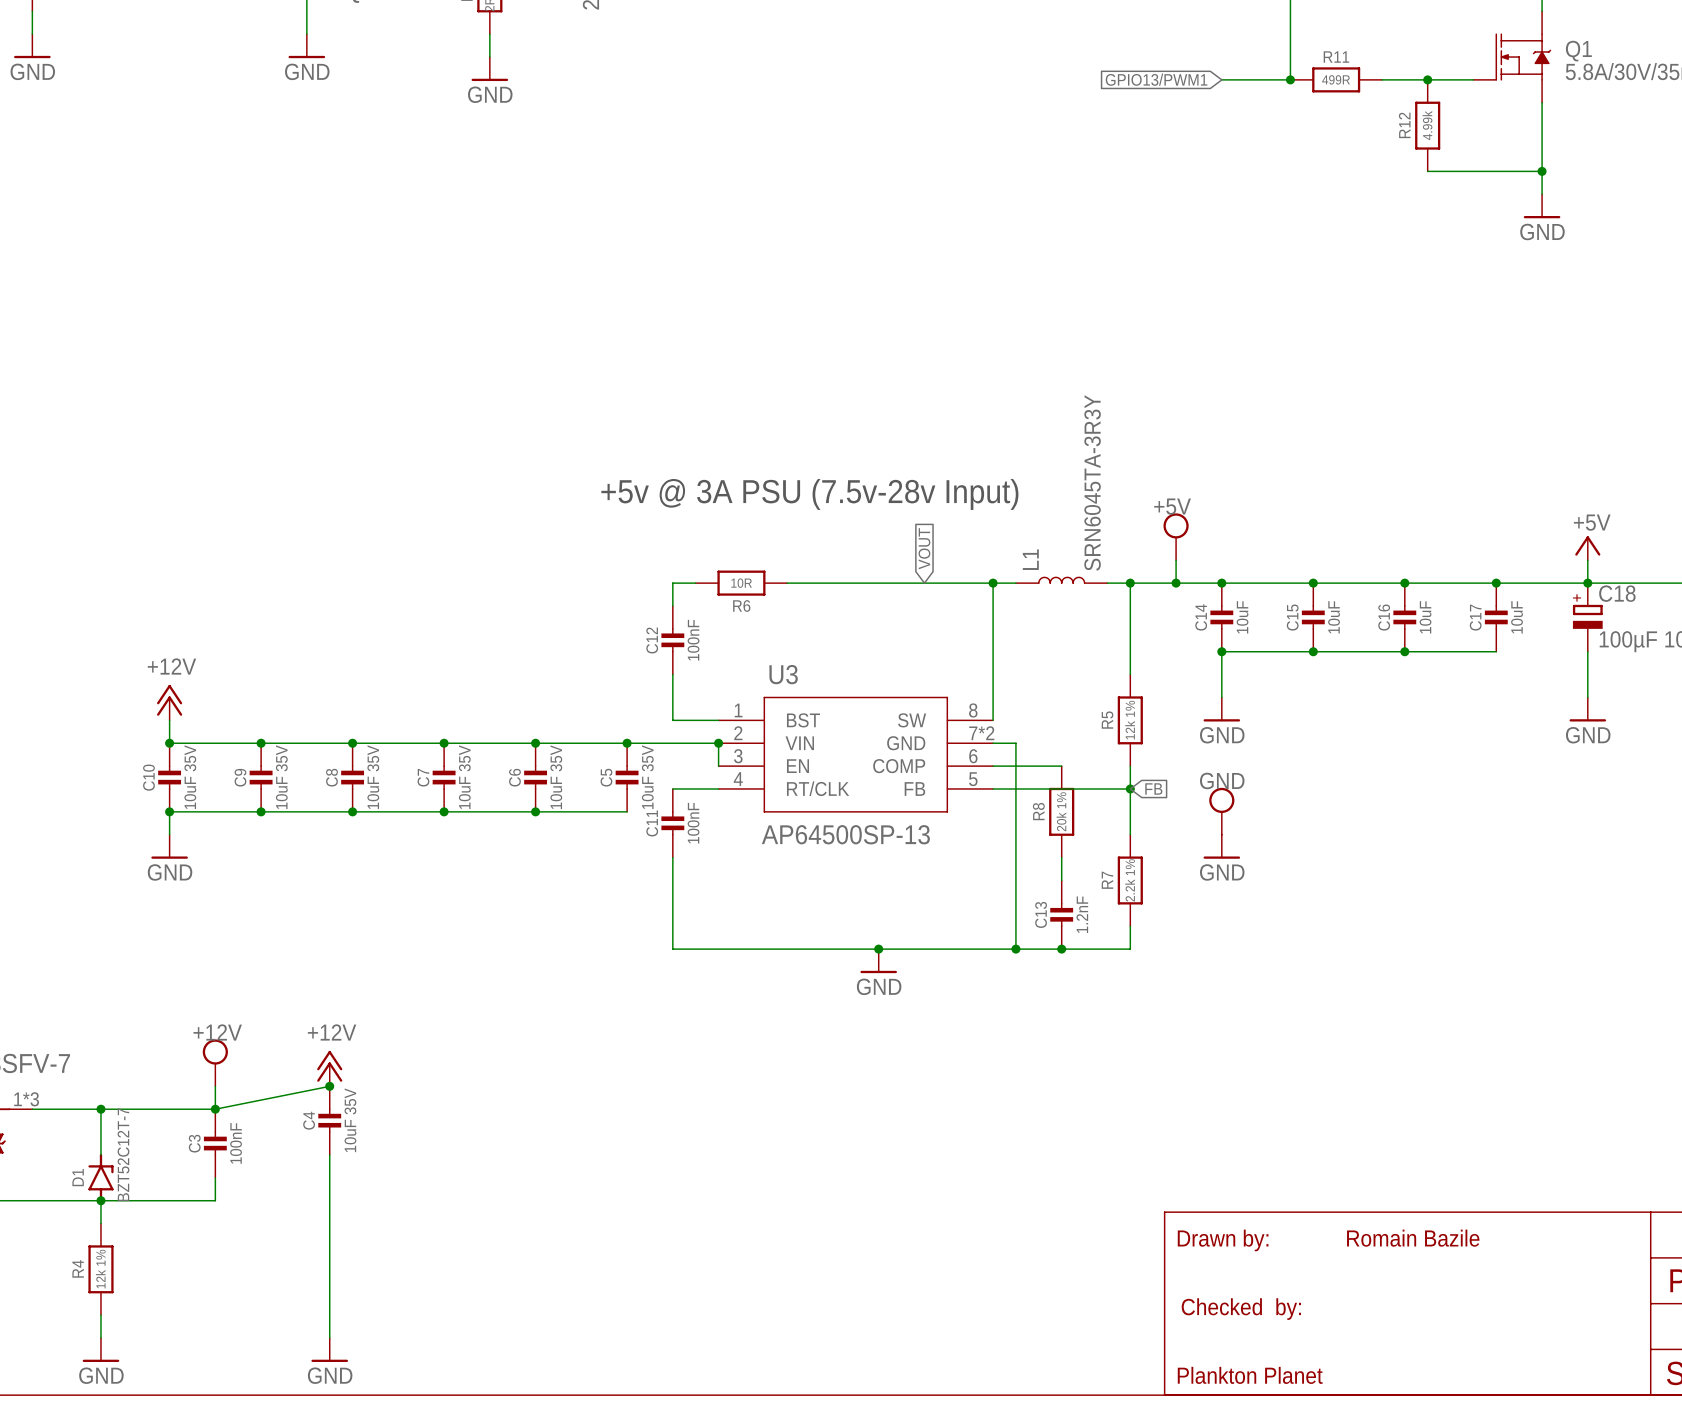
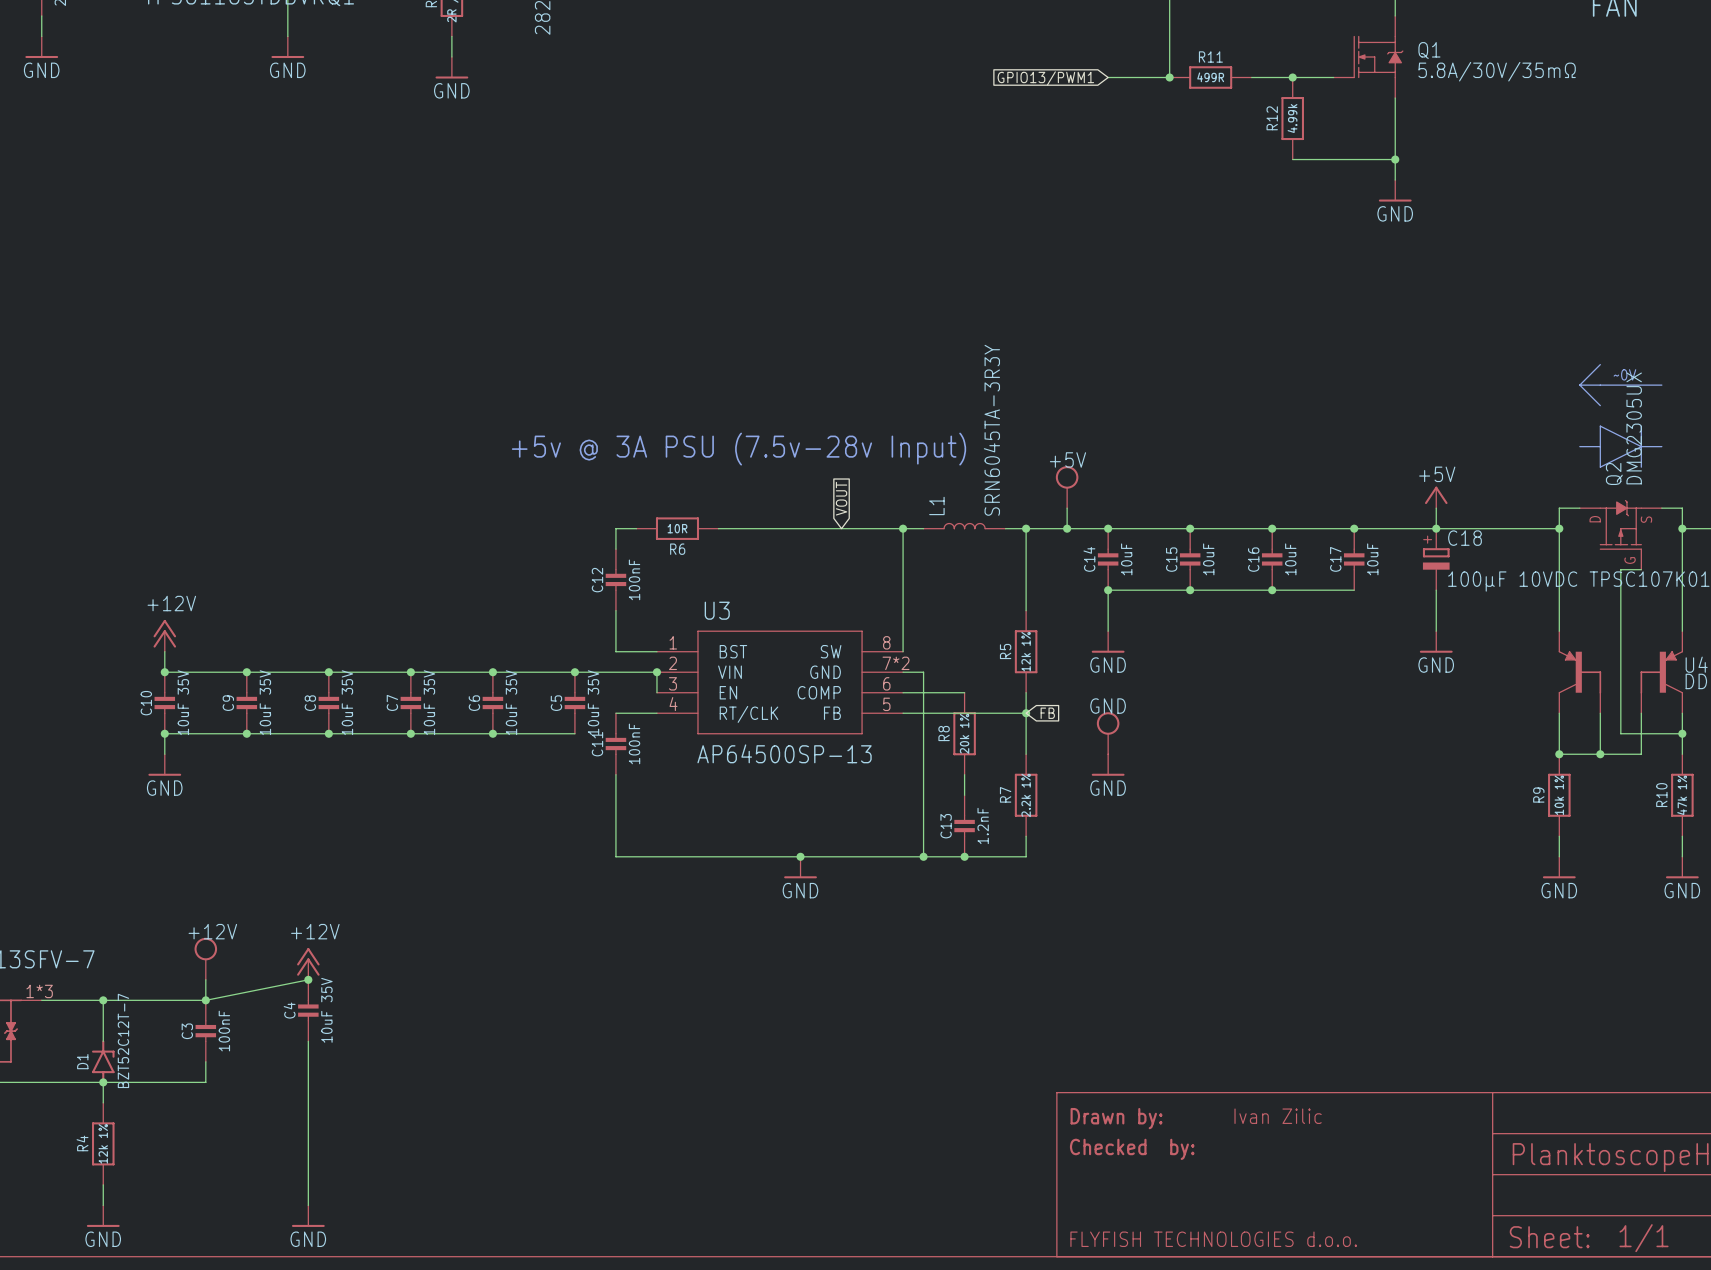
text: none -> Ivan Zilic (1278, 1116)
text: Romain Bazile (1413, 1238) -> none
text position: Checked by: (1241, 1309) -> Checked by: (1132, 1149)
text: Plankton Planet (1250, 1375) -> FLYFISH TECHNOLOGIES d.o.o. (1213, 1239)

